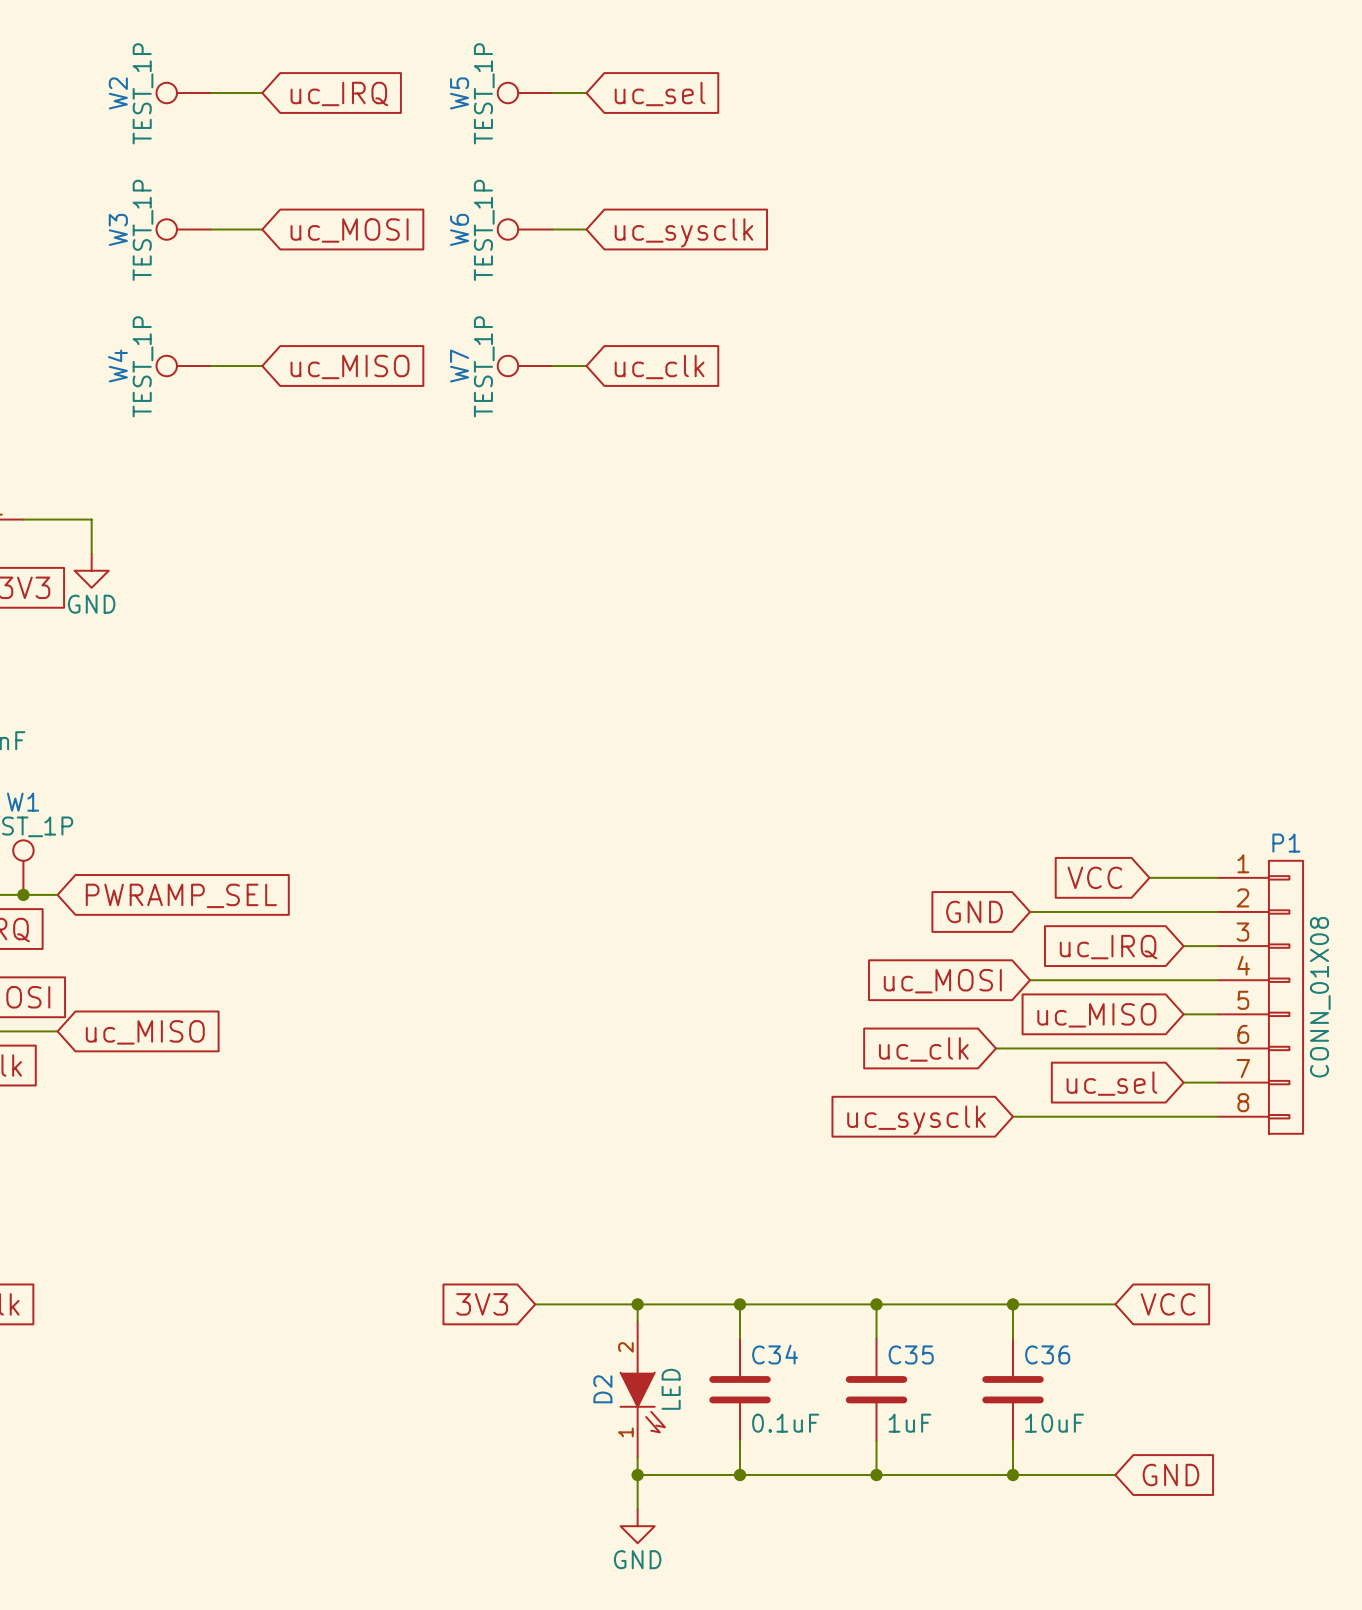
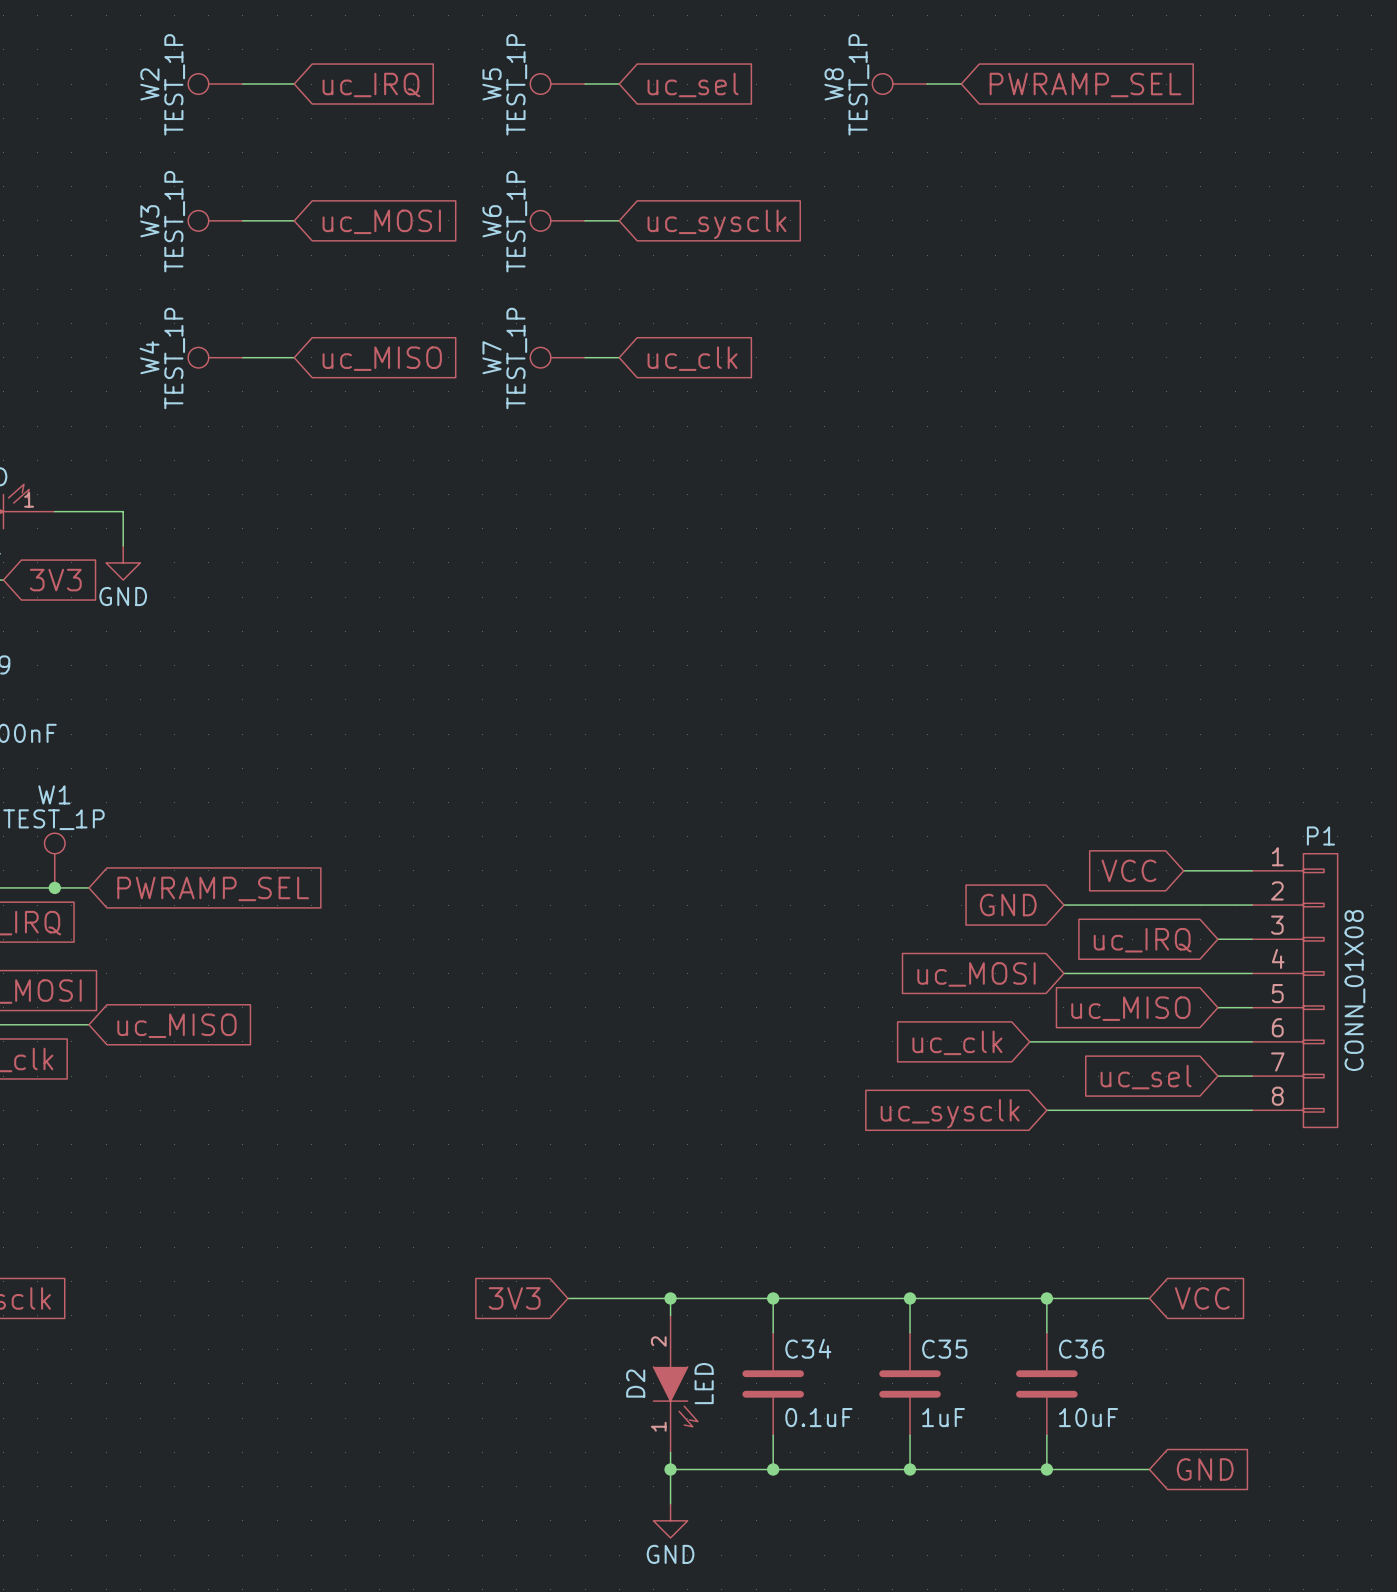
W8: none -> TEST_1P (899, 84)
wire: none -> (927, 84) (961, 84)
global label: none -> PWRAMP_SEL (1085, 84)

